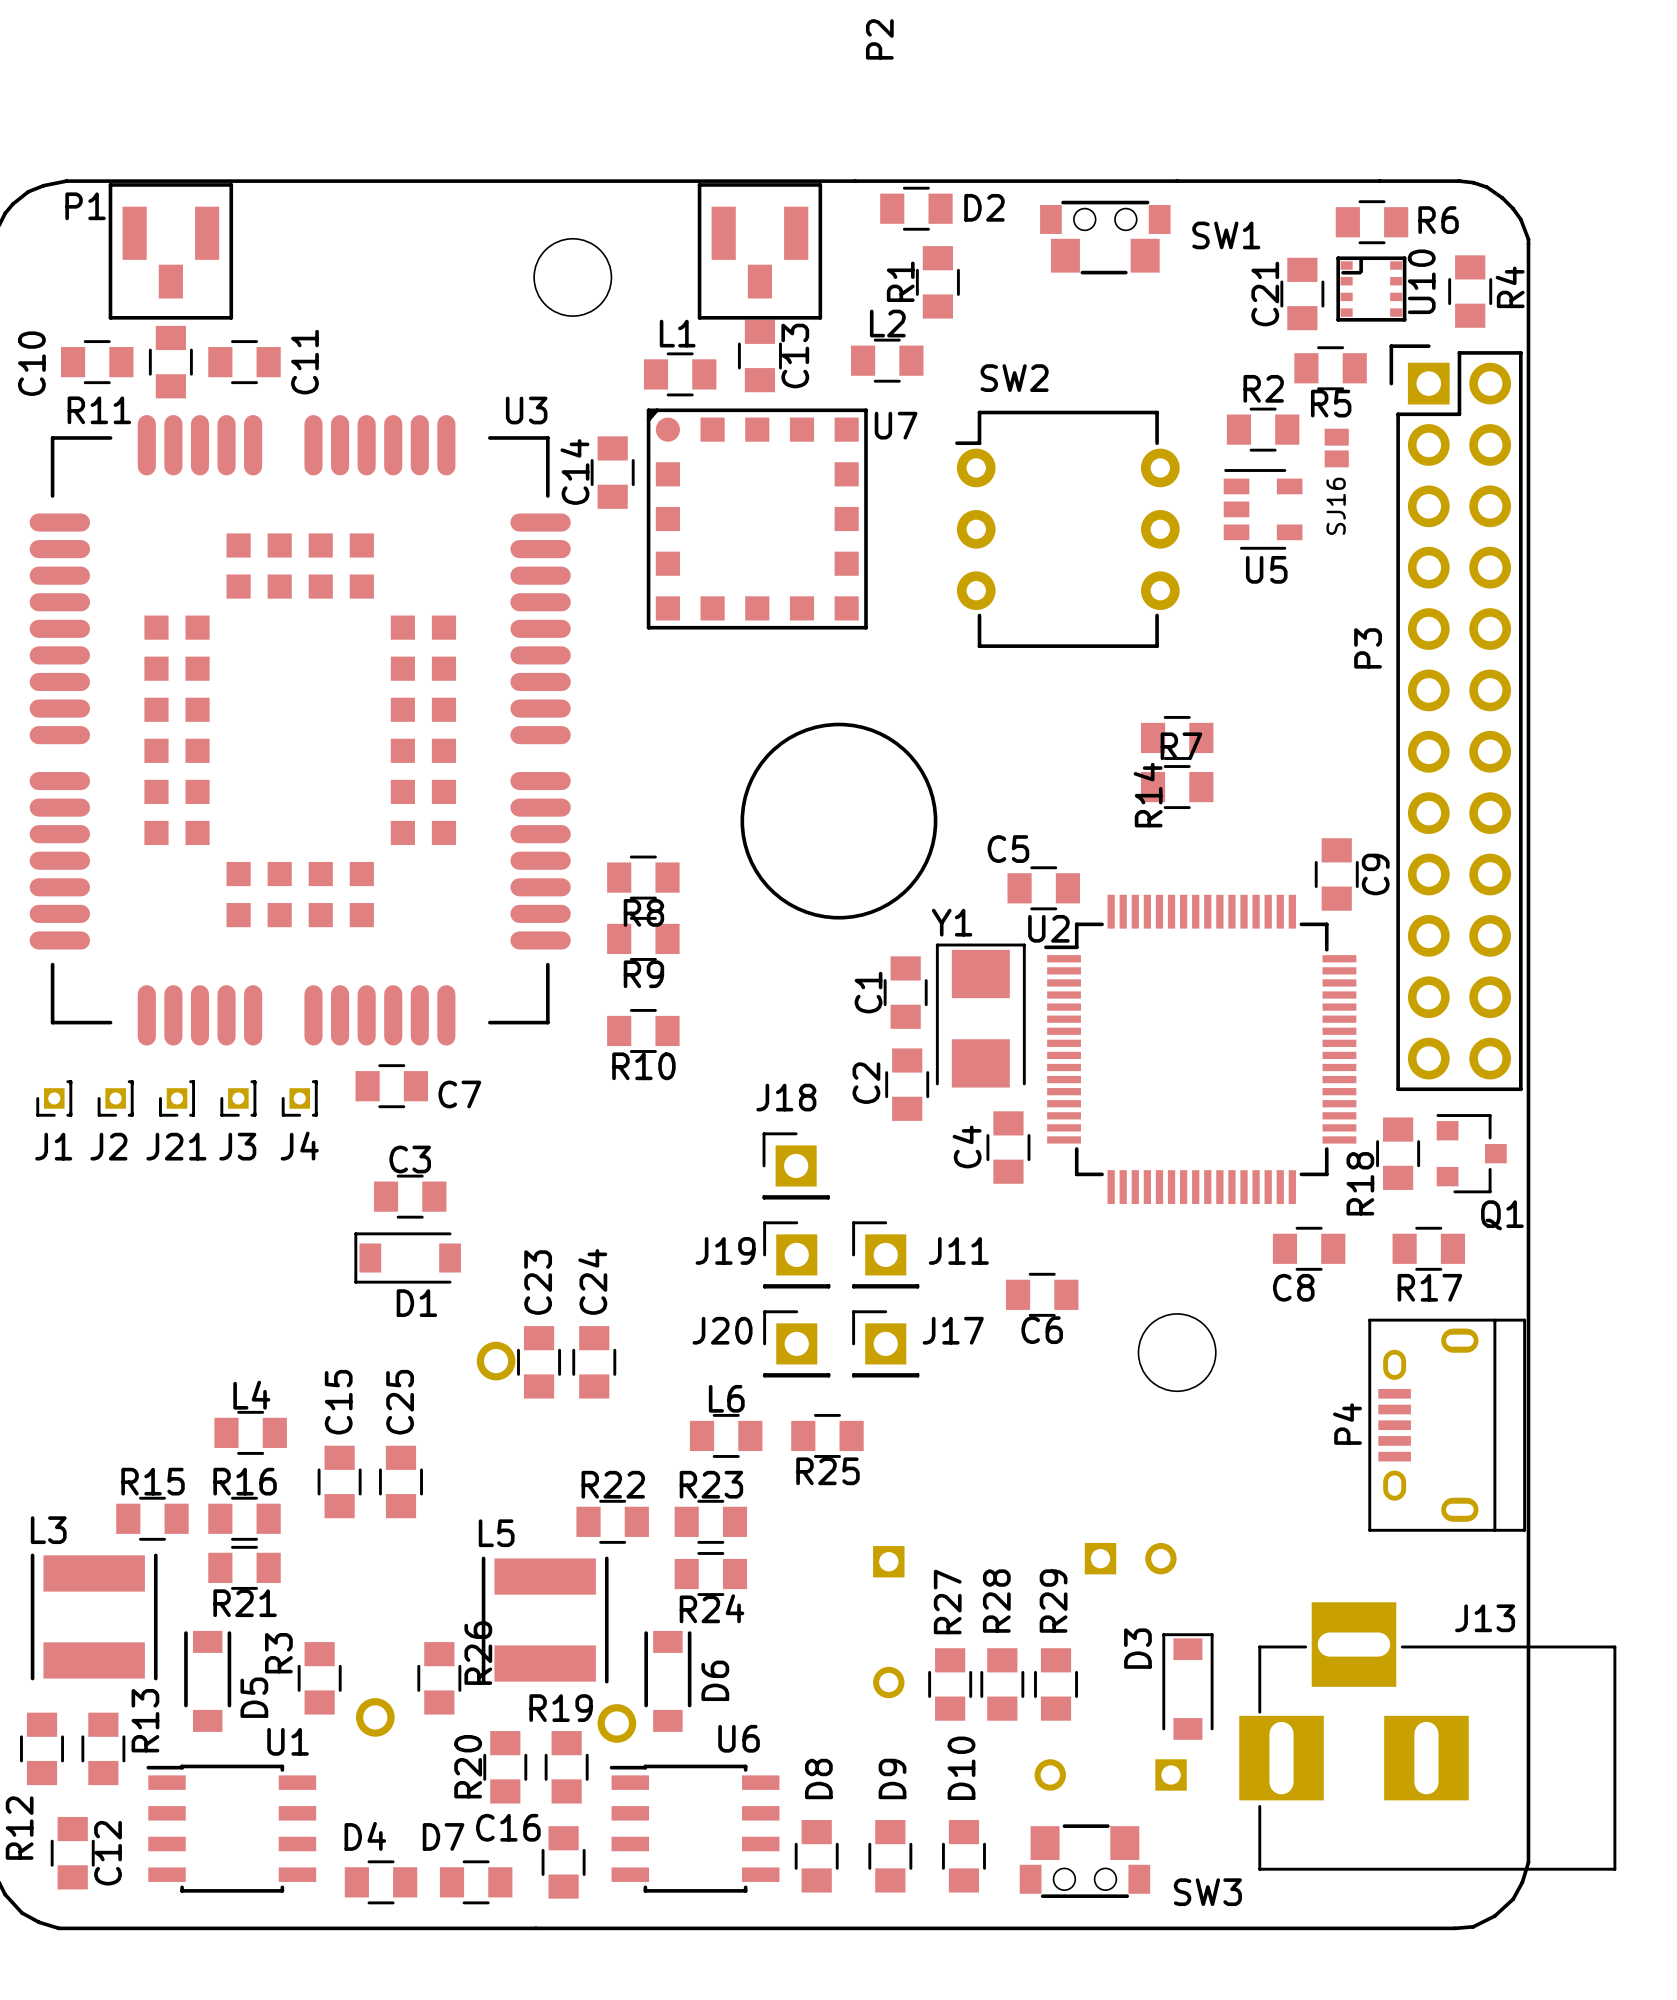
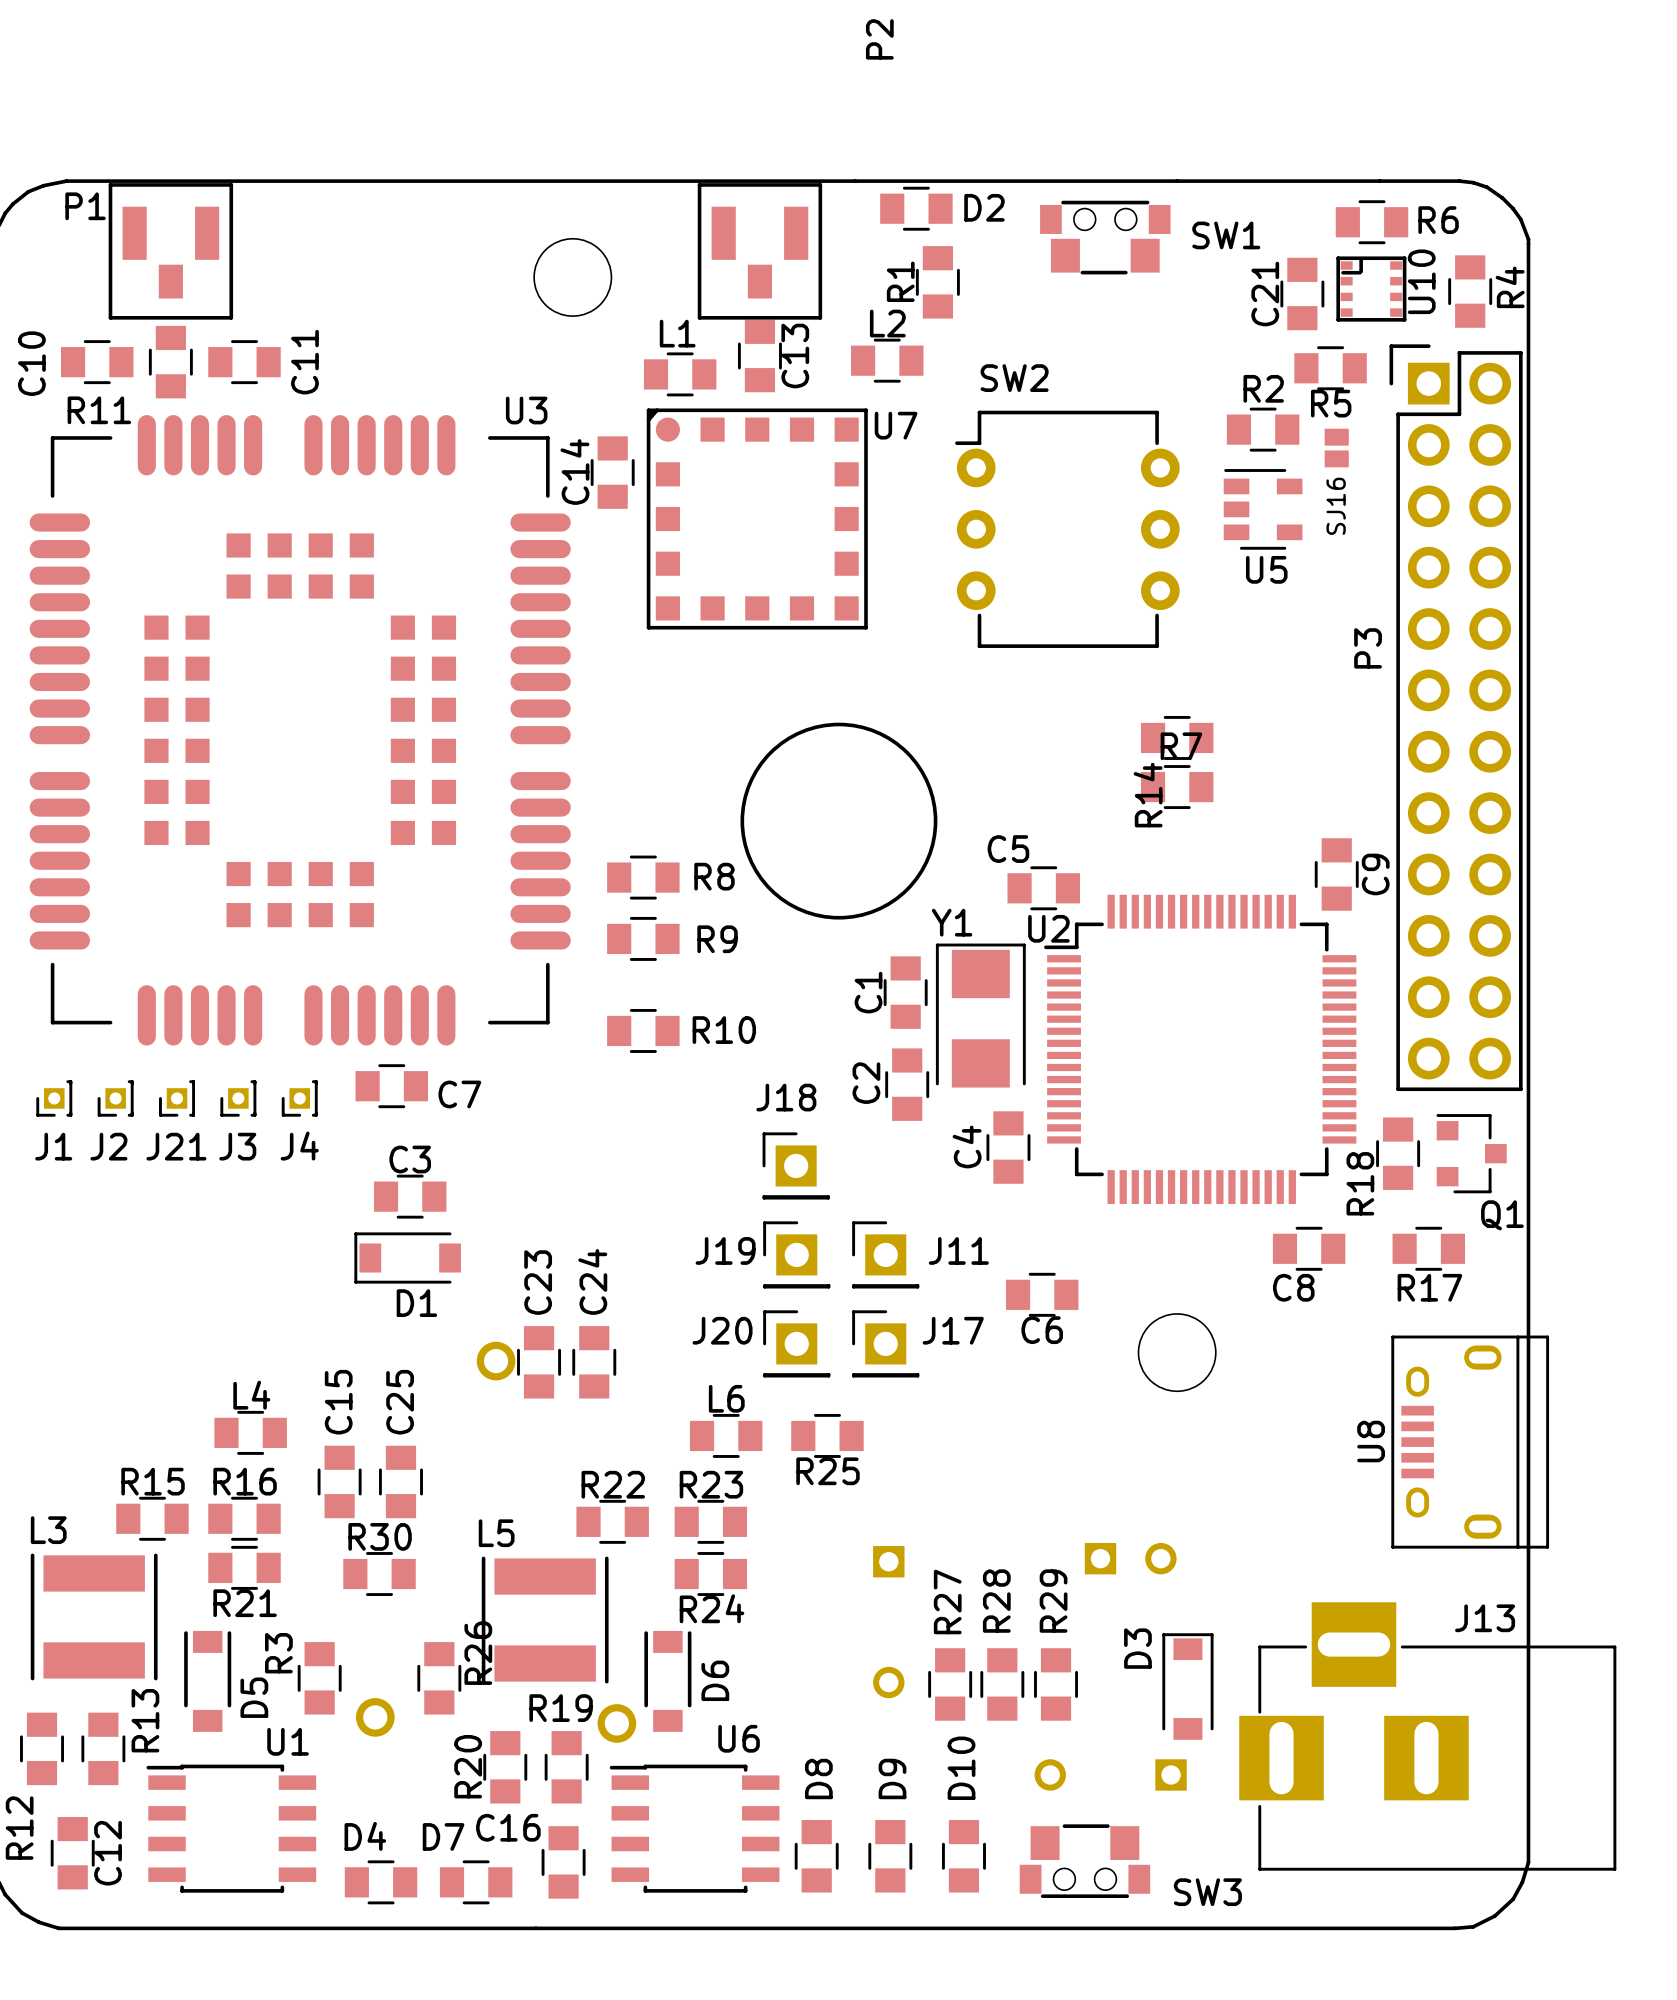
R8 name position: R8 (643, 912) -> R8 (714, 876)
R9 name position: R9 (643, 974) -> R9 (717, 939)
R10 name position: R10 (643, 1066) -> R10 (724, 1030)
P4: (1447, 1425) -> none
U8: none -> (1470, 1442)
R30: none -> (379, 1574)

